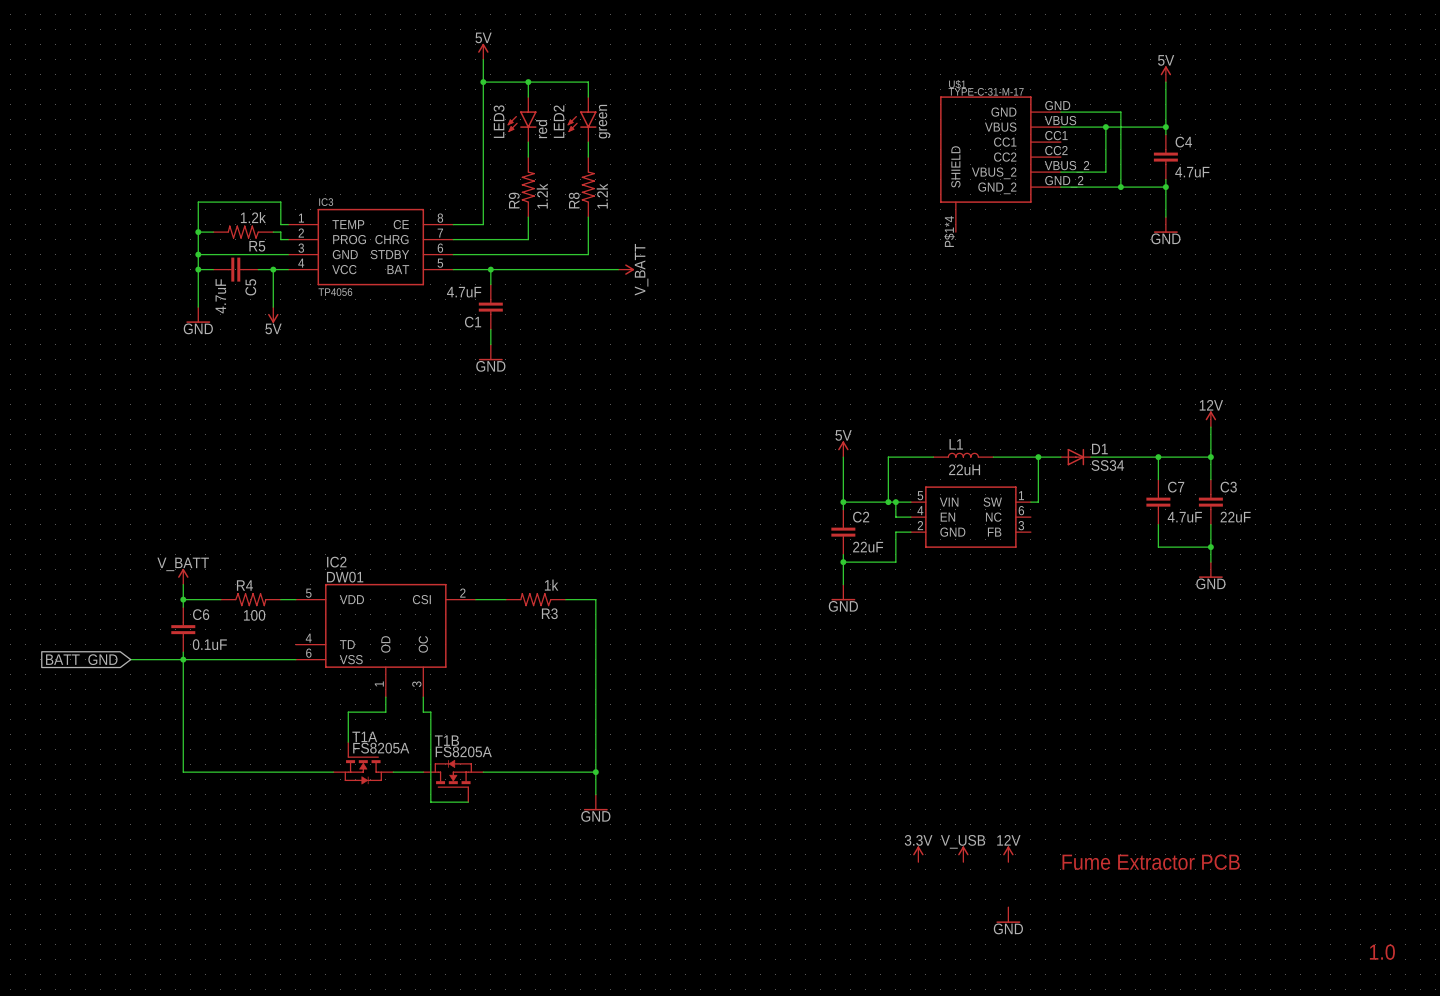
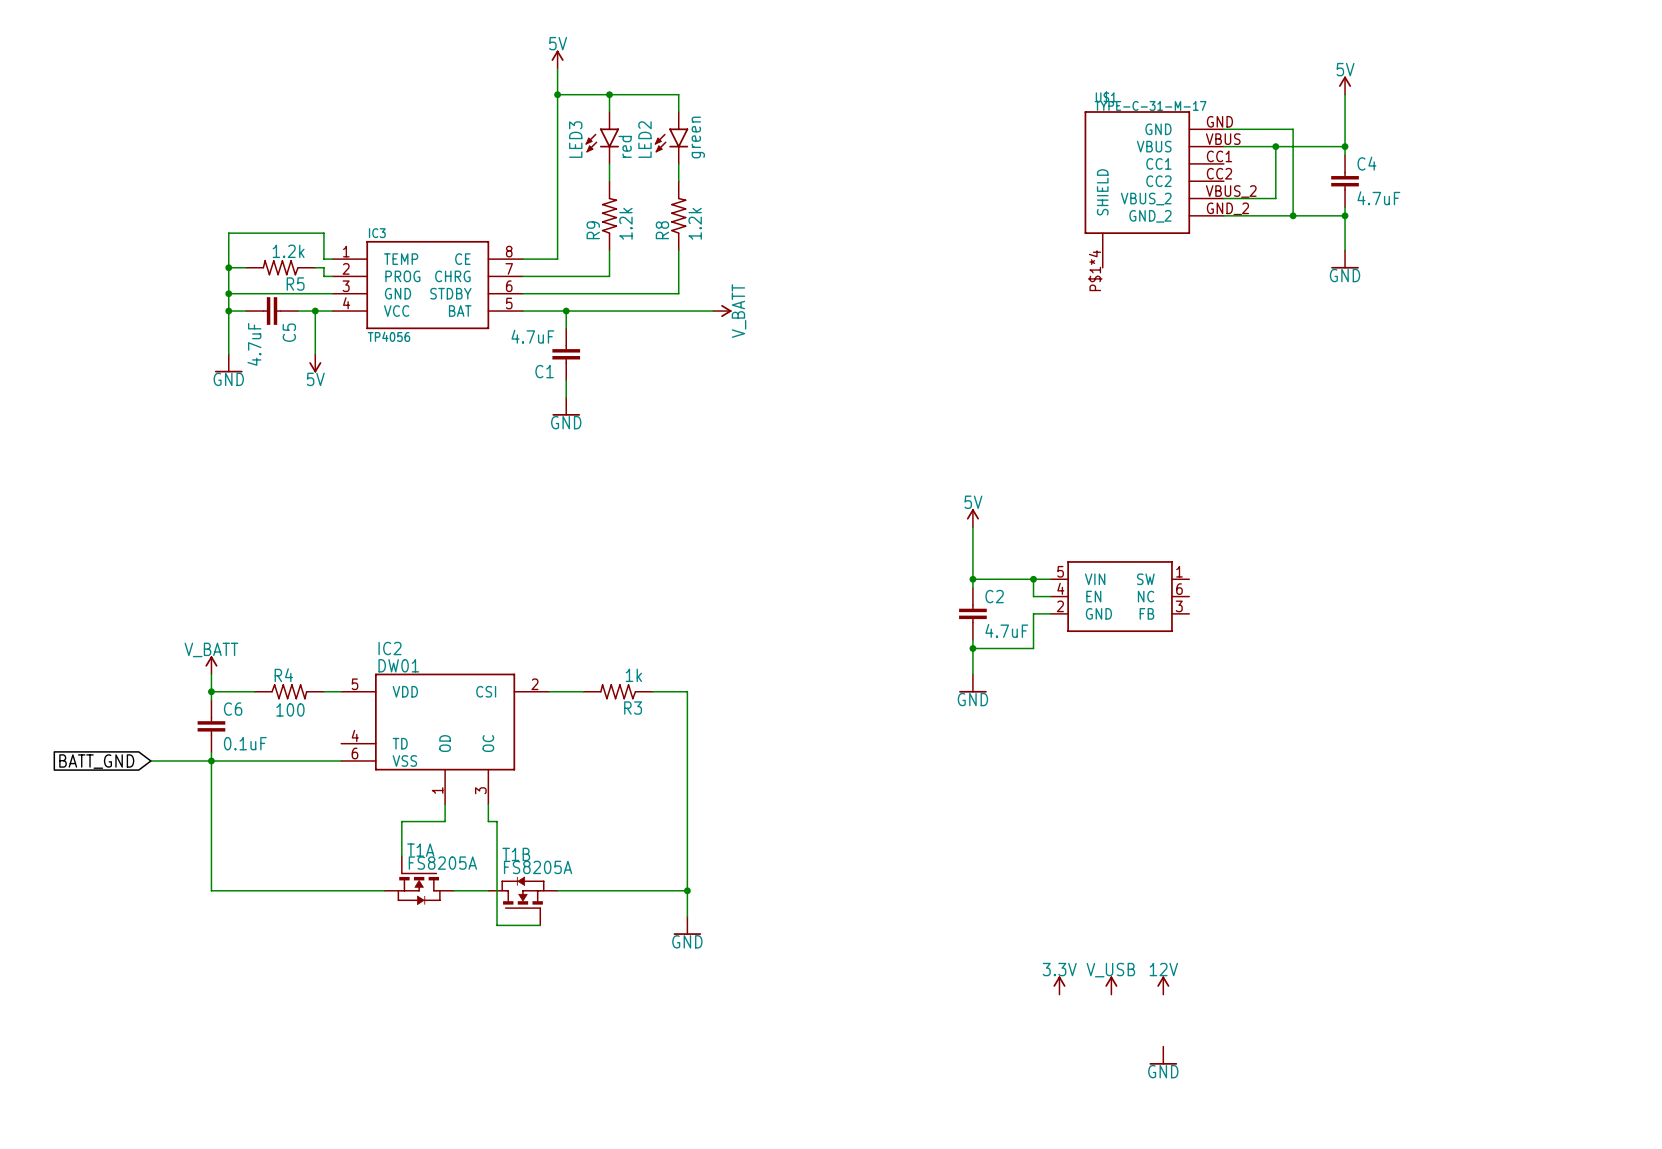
power symbol: 12V (1210, 419) -> none
wire: (1210, 427) (1210, 479) -> none
L1: 22uH (963, 455) -> none
wire: (933, 457) (888, 457) (888, 502) -> none
wire: (993, 457) (1060, 457) -> none
wire: (1038, 457) (1038, 502) (1030, 502) -> none
junction: (1038, 457) -> none
D1: SS34 (1075, 457) -> none
wire: (1090, 457) (1210, 457) -> none
wire: (1158, 457) (1158, 479) -> none
junction: (1158, 457) -> none
junction: (1210, 457) -> none
junction: (888, 502) -> none
C7: 4.7uF (1158, 502) -> none
C3: 22uF (1210, 502) -> none
wire: (1158, 524) (1158, 547) (1210, 547) -> none
wire: (1210, 524) (1210, 562) -> none
C2 value: 22uF (868, 547) -> 4.7uF (1006, 630)
junction: (1210, 547) -> none
power symbol: GND (1210, 570) -> none
text: Fume Extractor PCB (1151, 862) -> none
text: 1.0 (1382, 952) -> none

